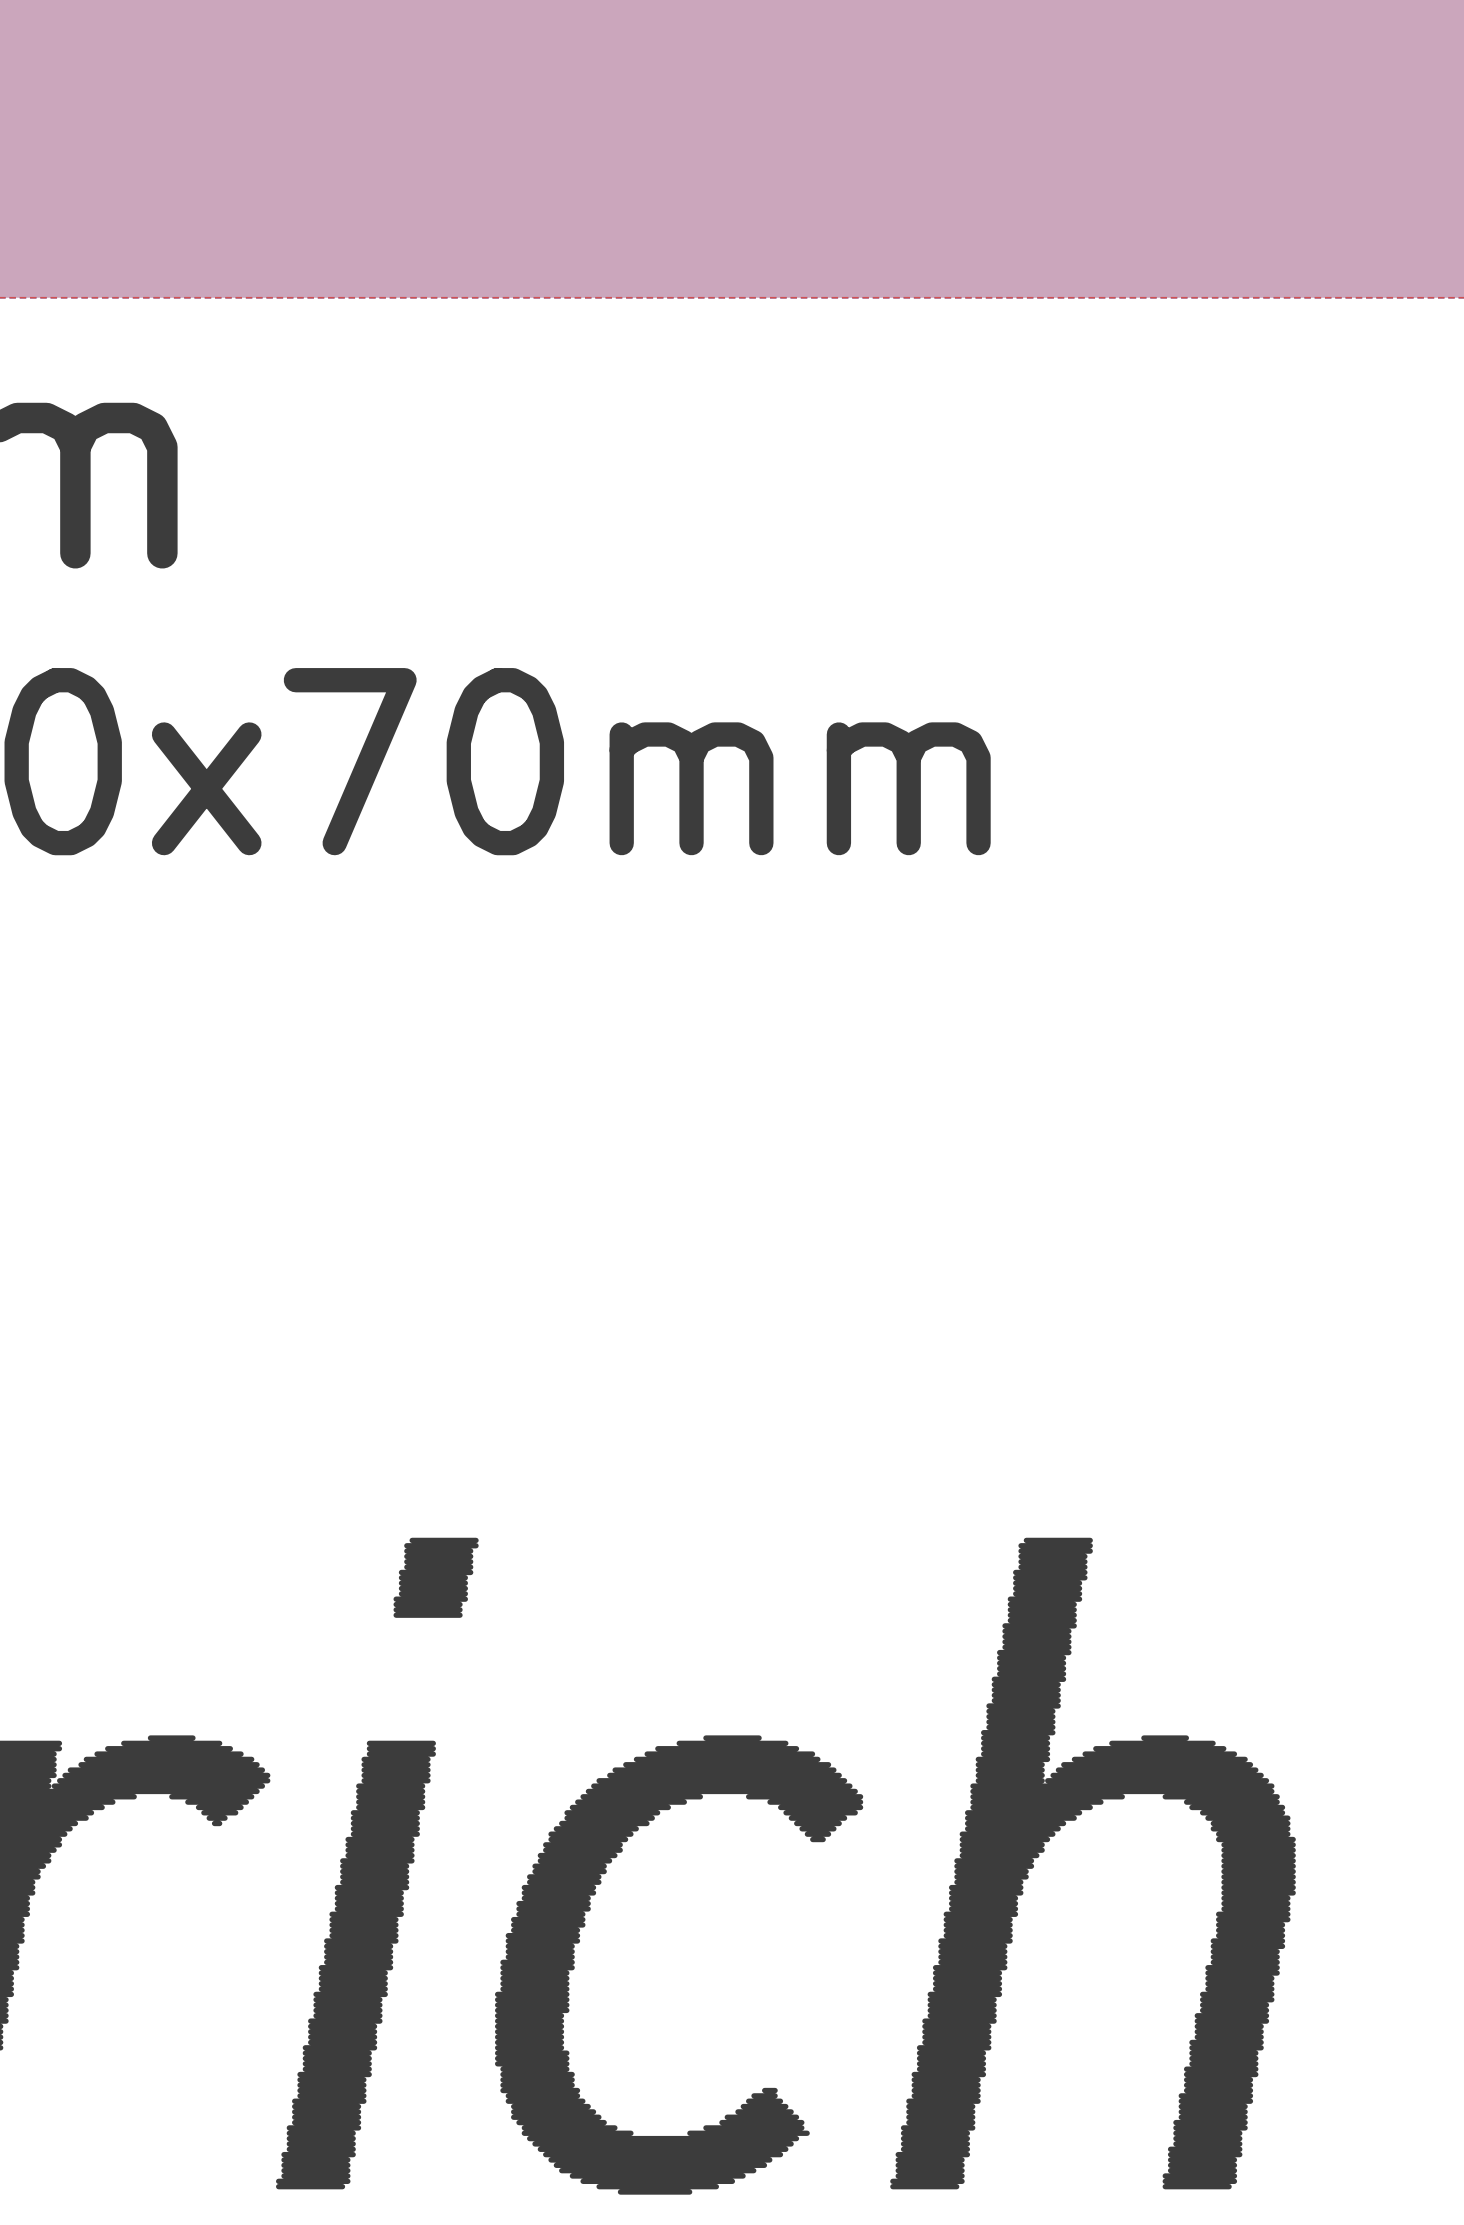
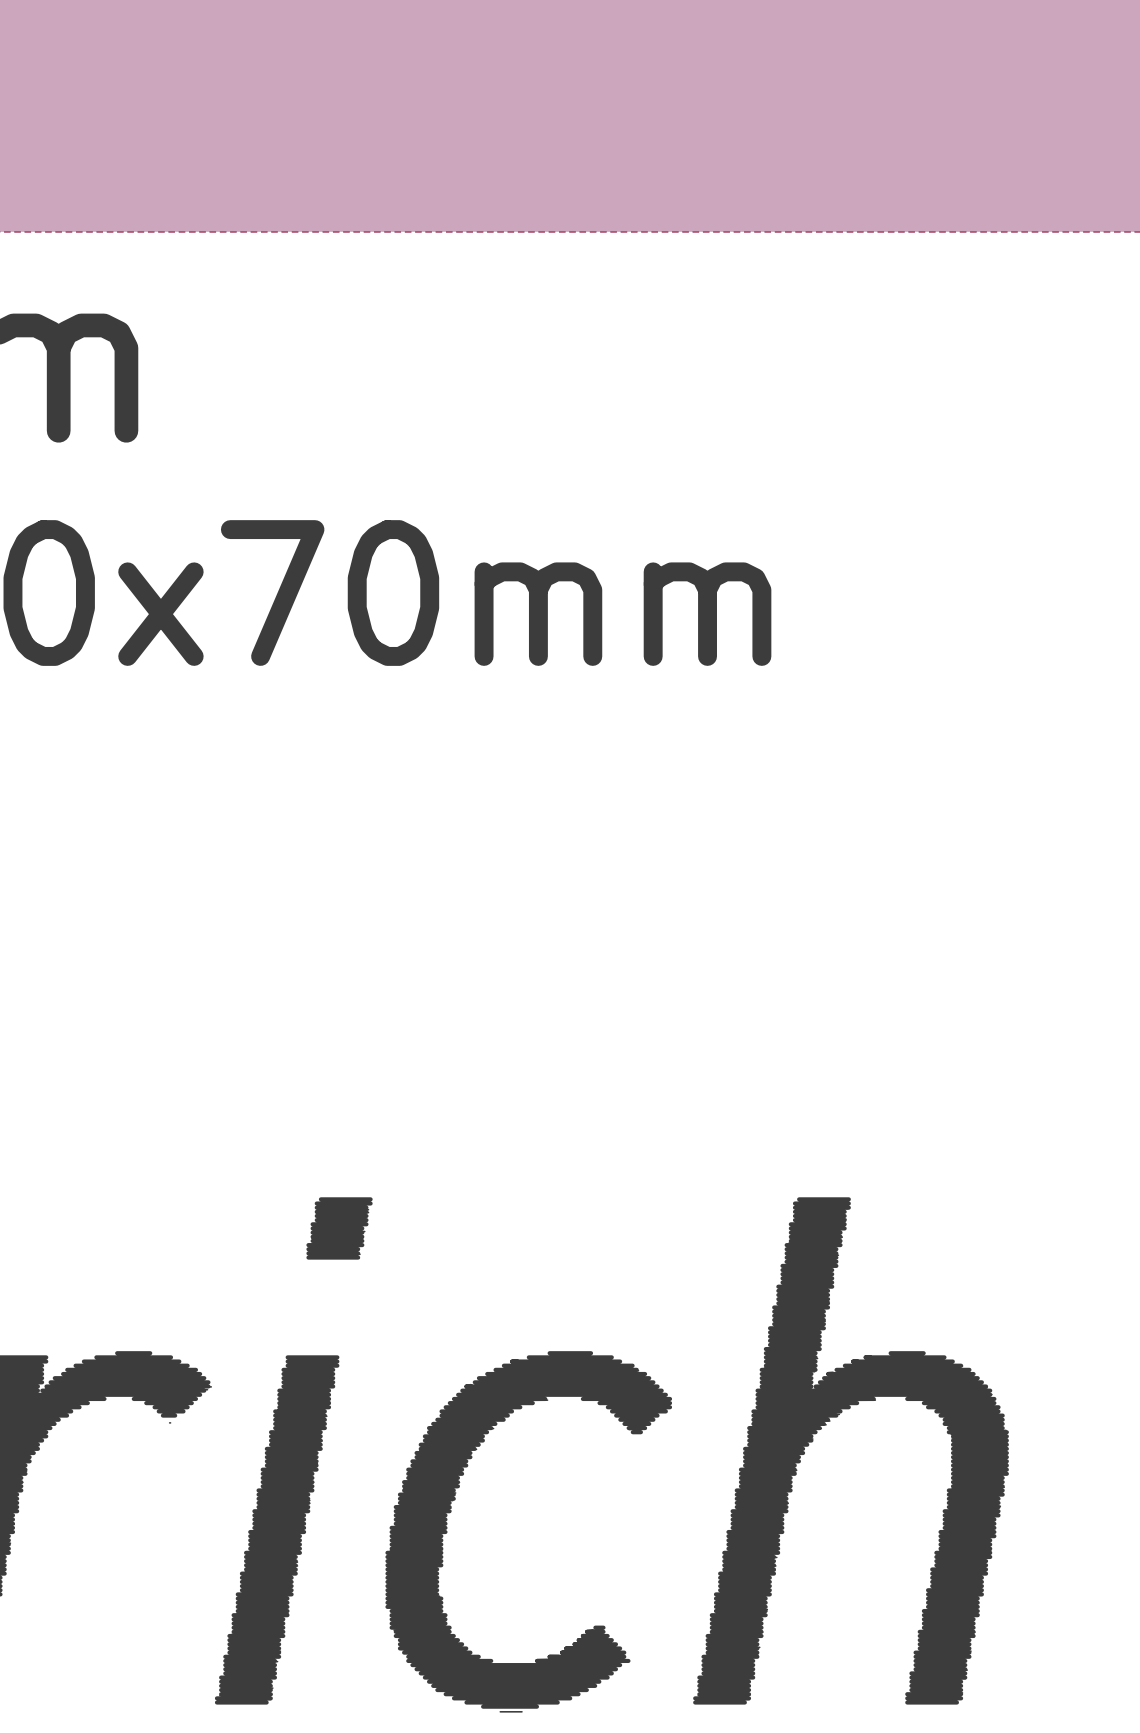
line: none -> (500, 1711) (522, 1711)

